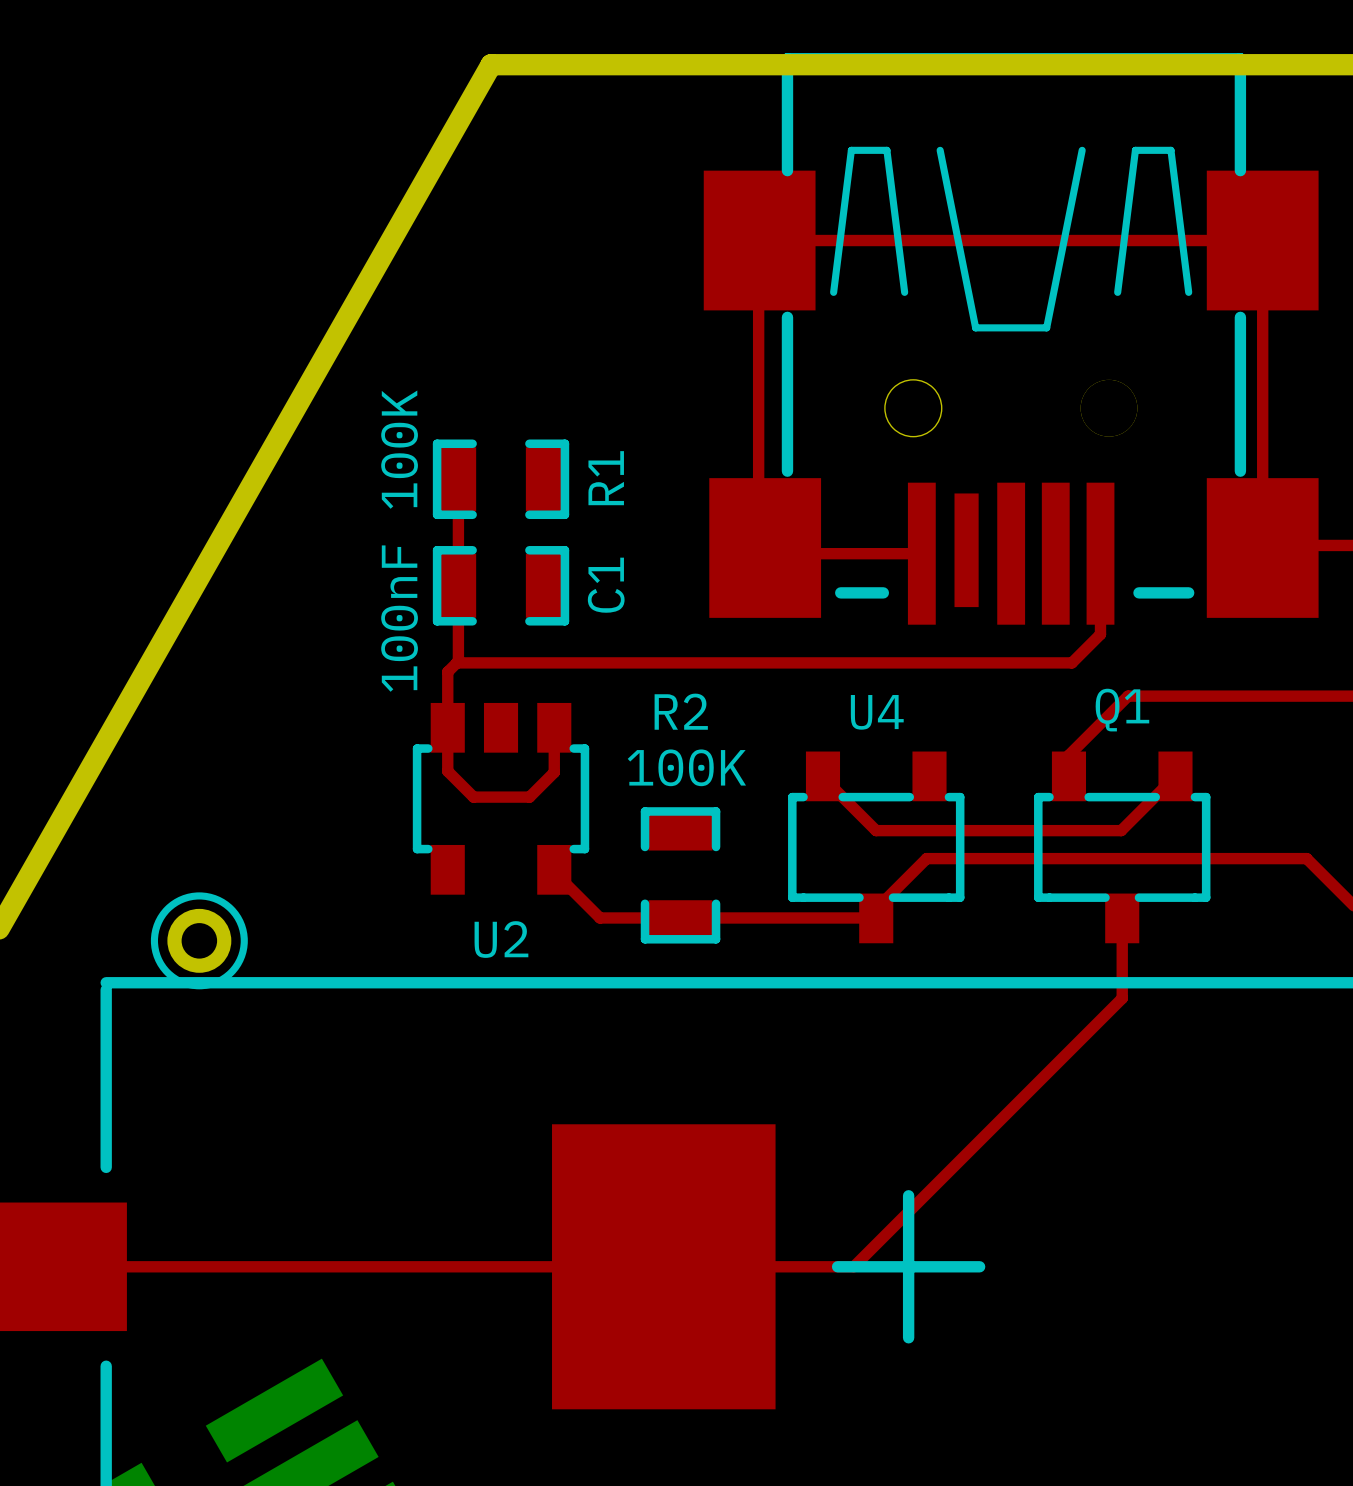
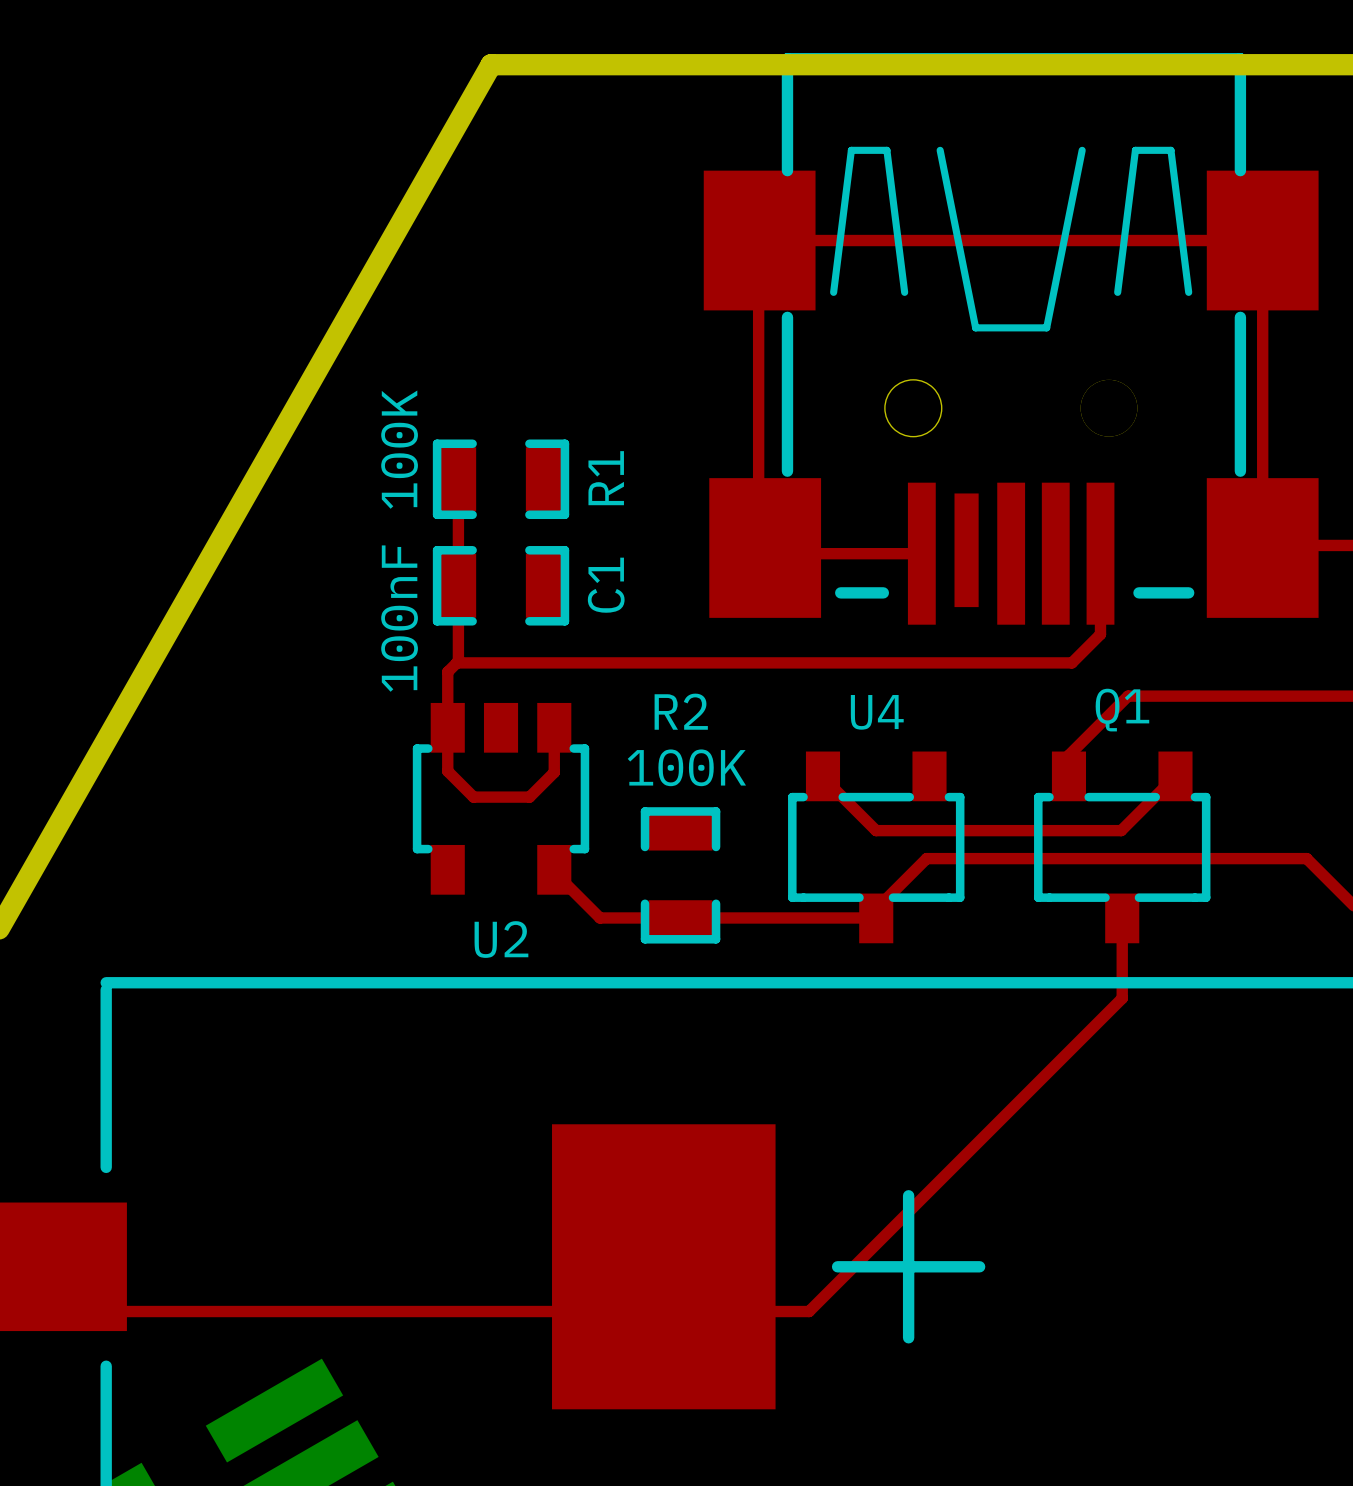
part: (199, 940) -> none
top track: (15, 1266) (853, 1266) -> (15, 1311) (809, 1311) (853, 1266)

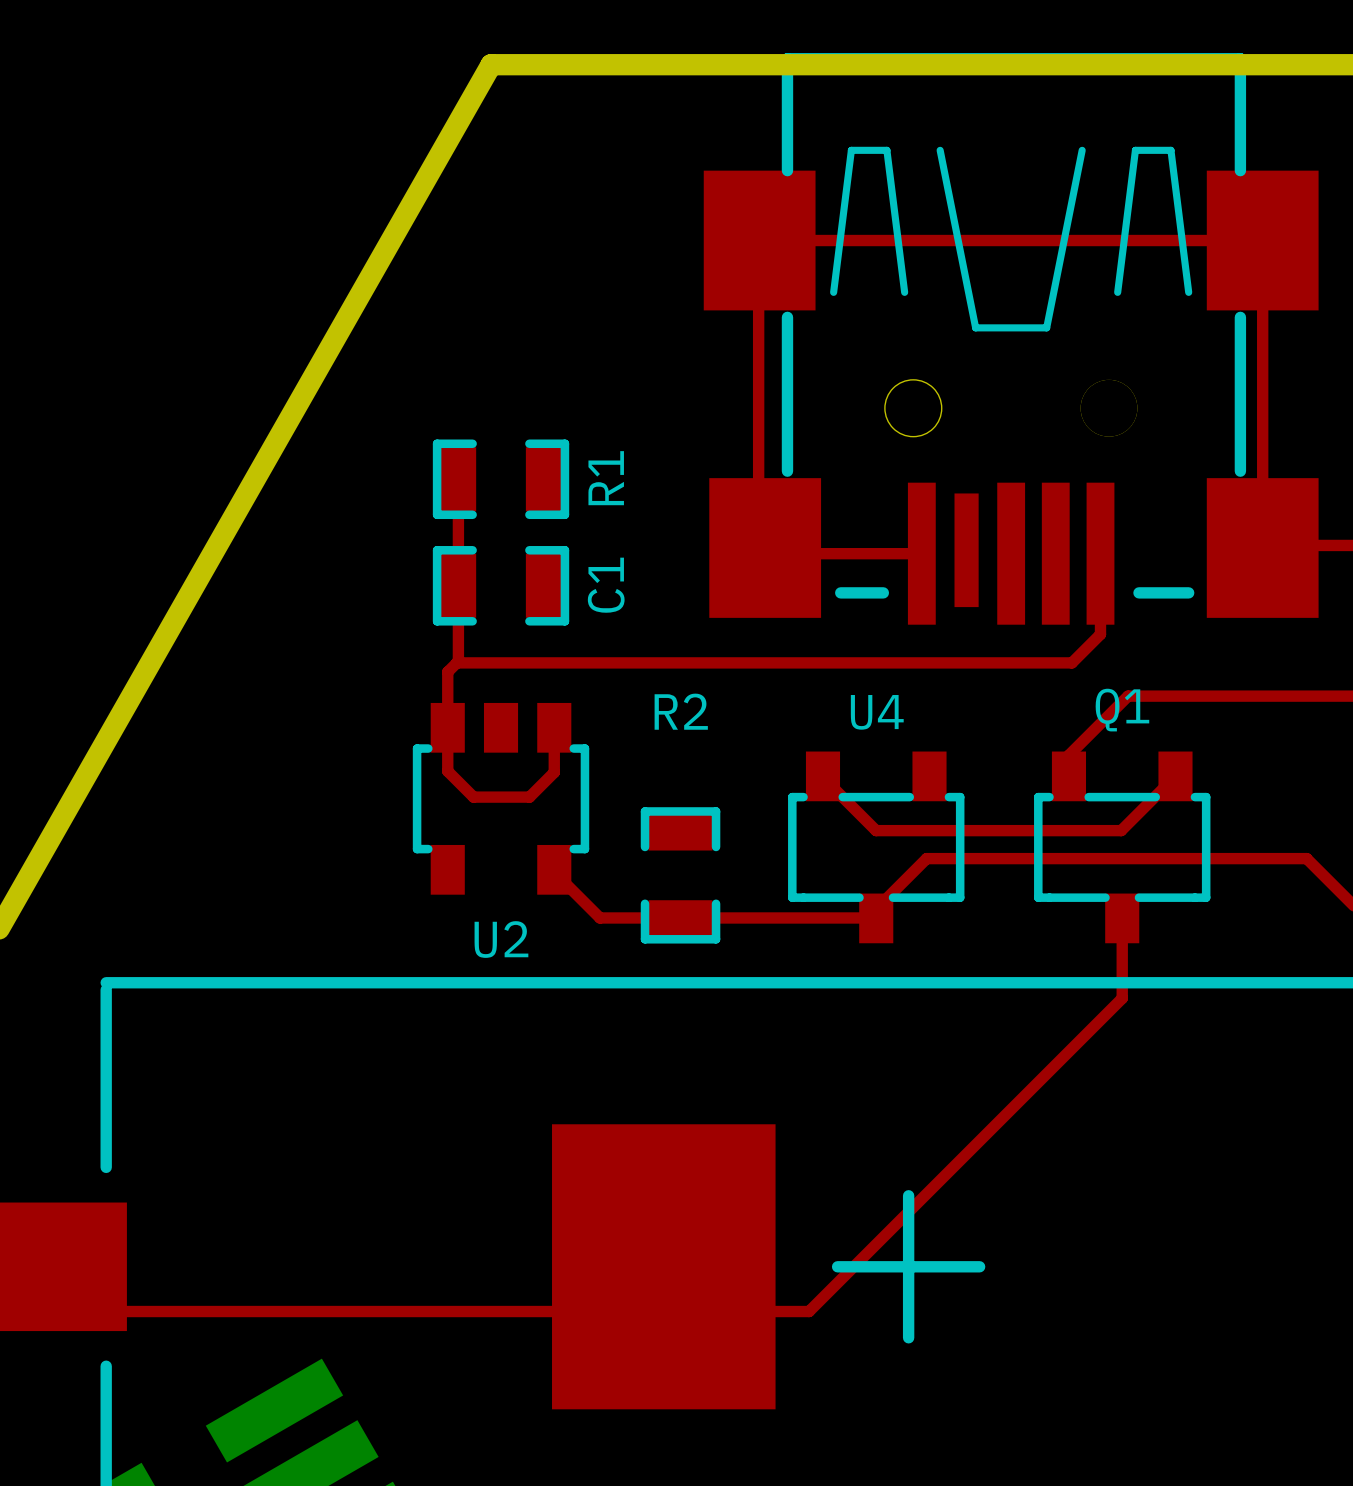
R1 value: 100K (399, 449) -> none
C1 value: 100nF (399, 618) -> none
R2 value: 100K (686, 767) -> none

